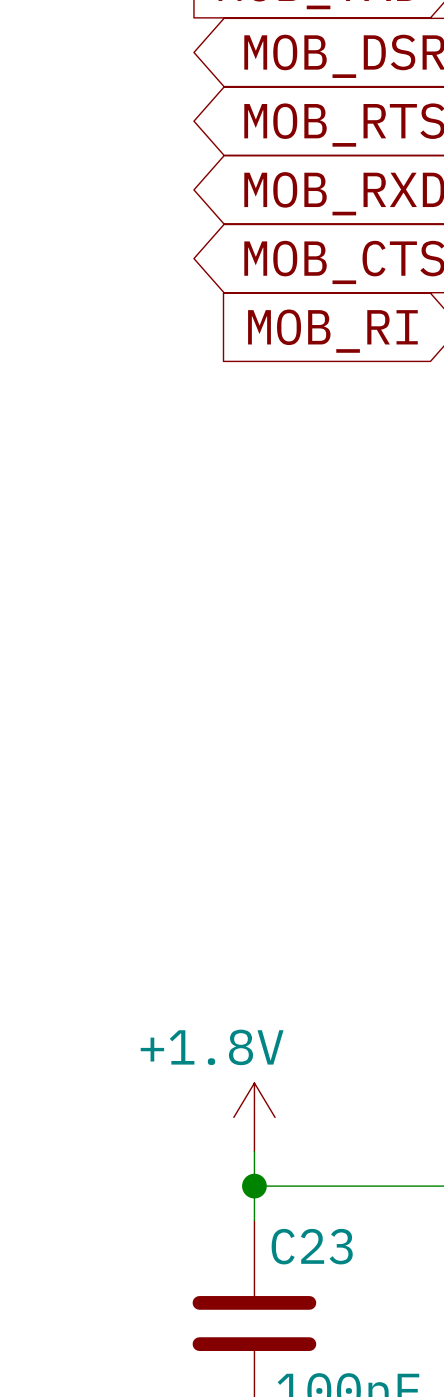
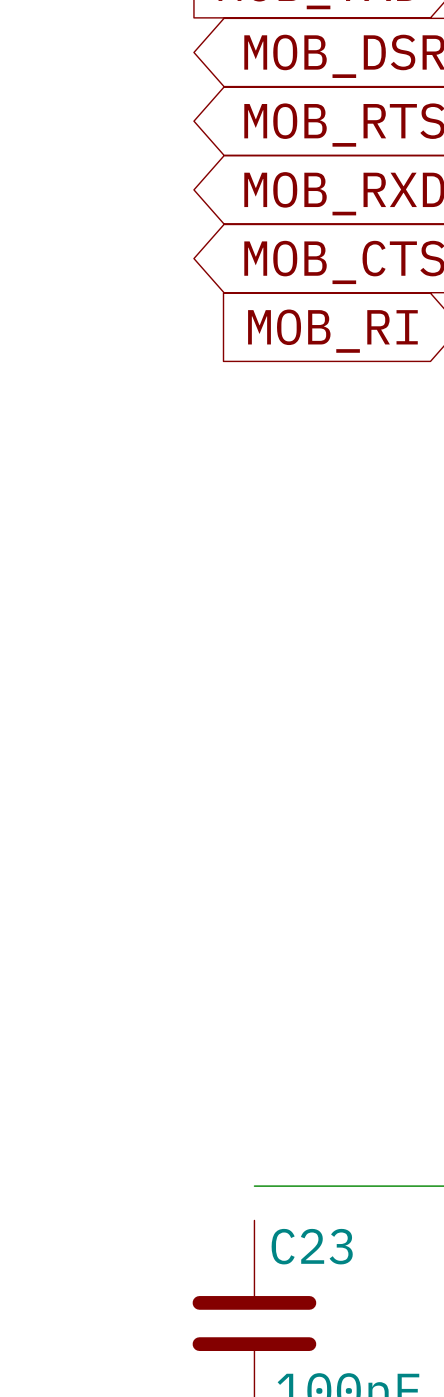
power symbol: +1.8V (254, 1117) -> none
wire: (254, 1151) (254, 1220) -> none
junction: (254, 1186) -> none

